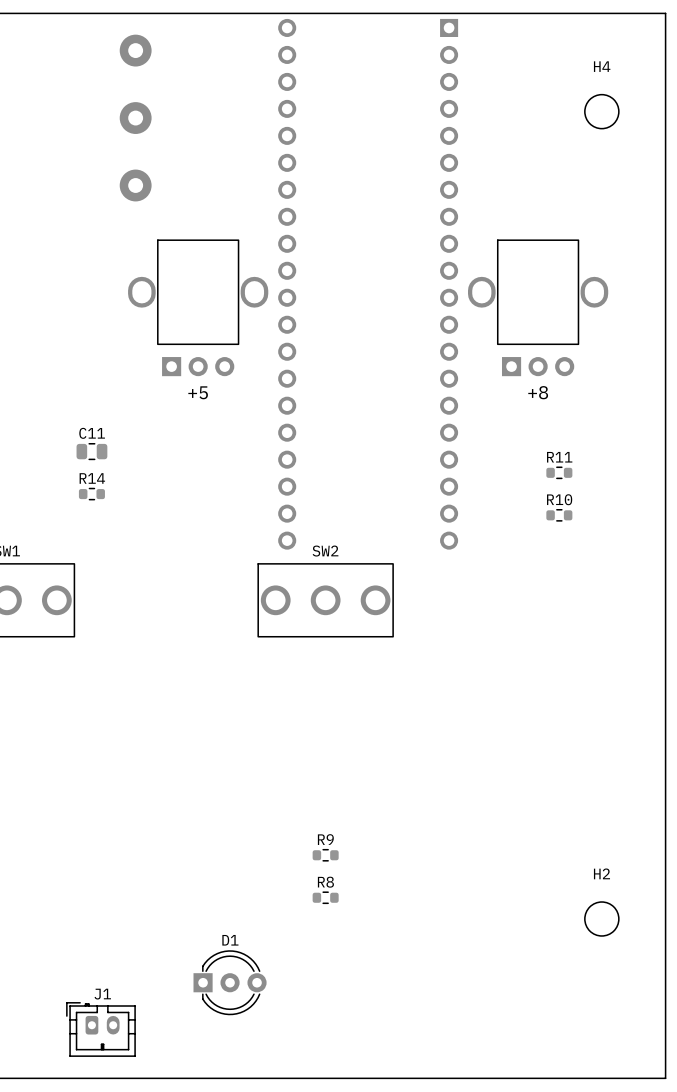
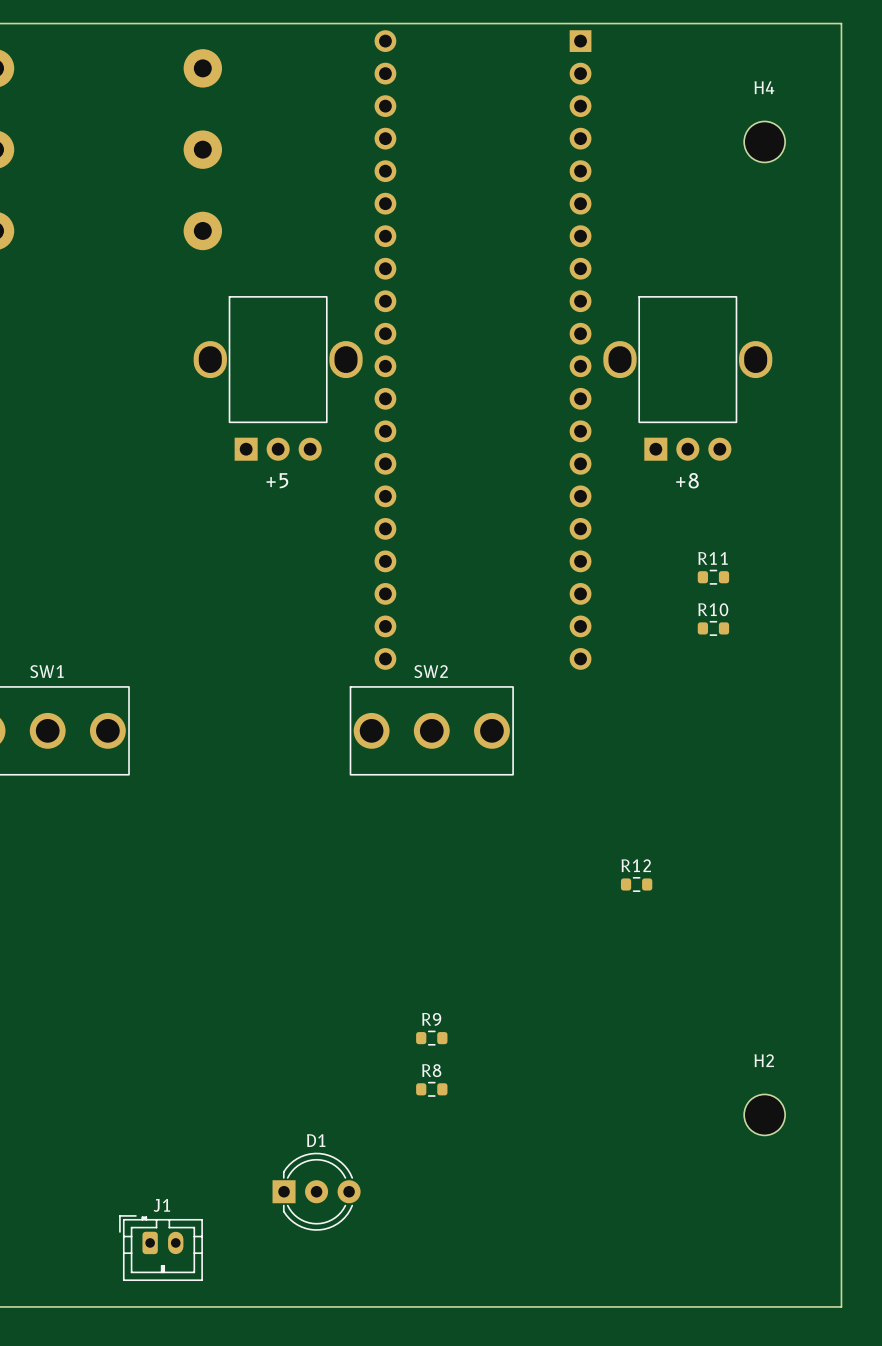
C11: (91, 451) -> none
R14: (91, 494) -> none
R12: none -> (636, 884)

